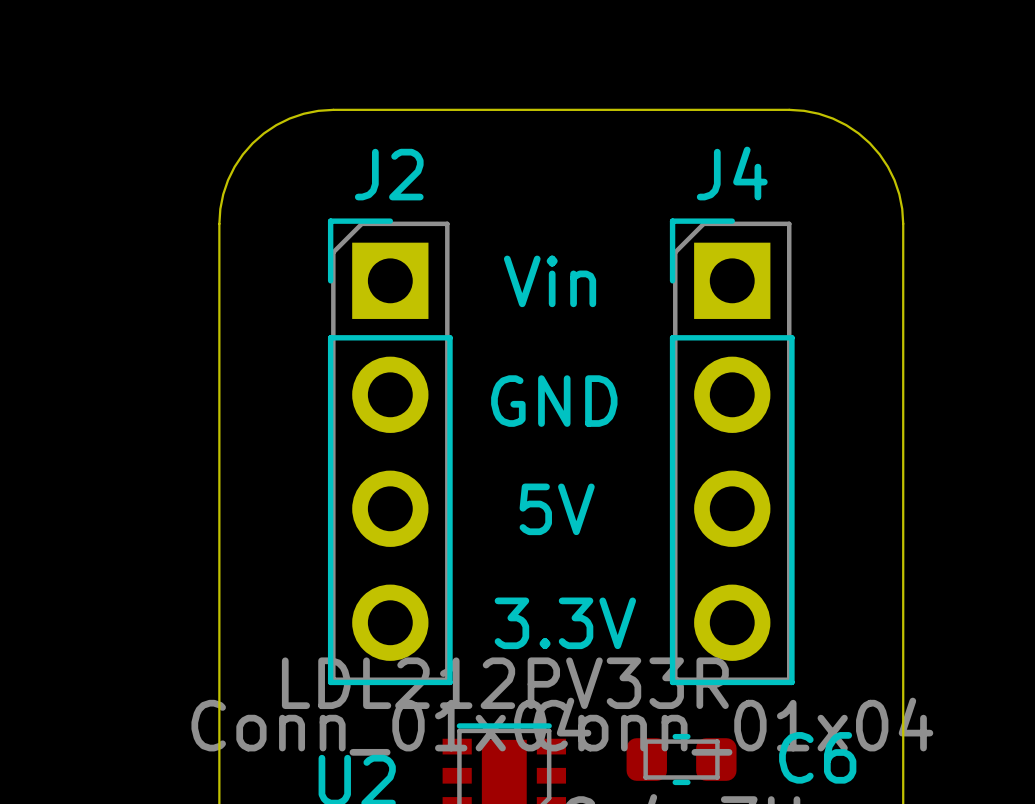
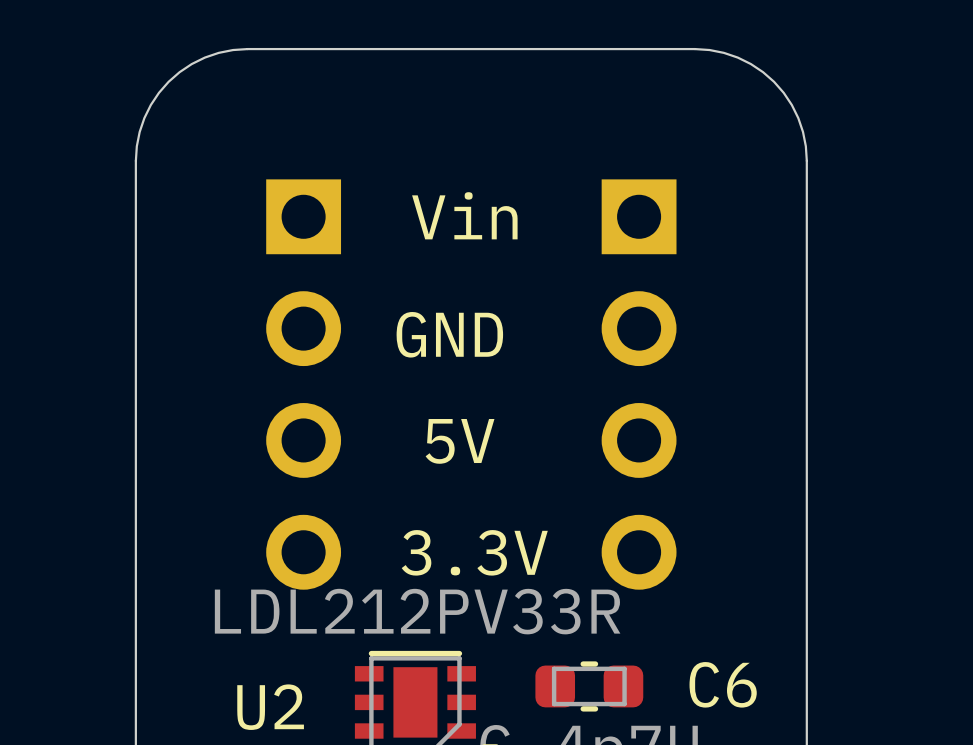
J2 side: top (390, 451) -> bottom (303, 384)
J4 side: top (732, 451) -> bottom (639, 384)

